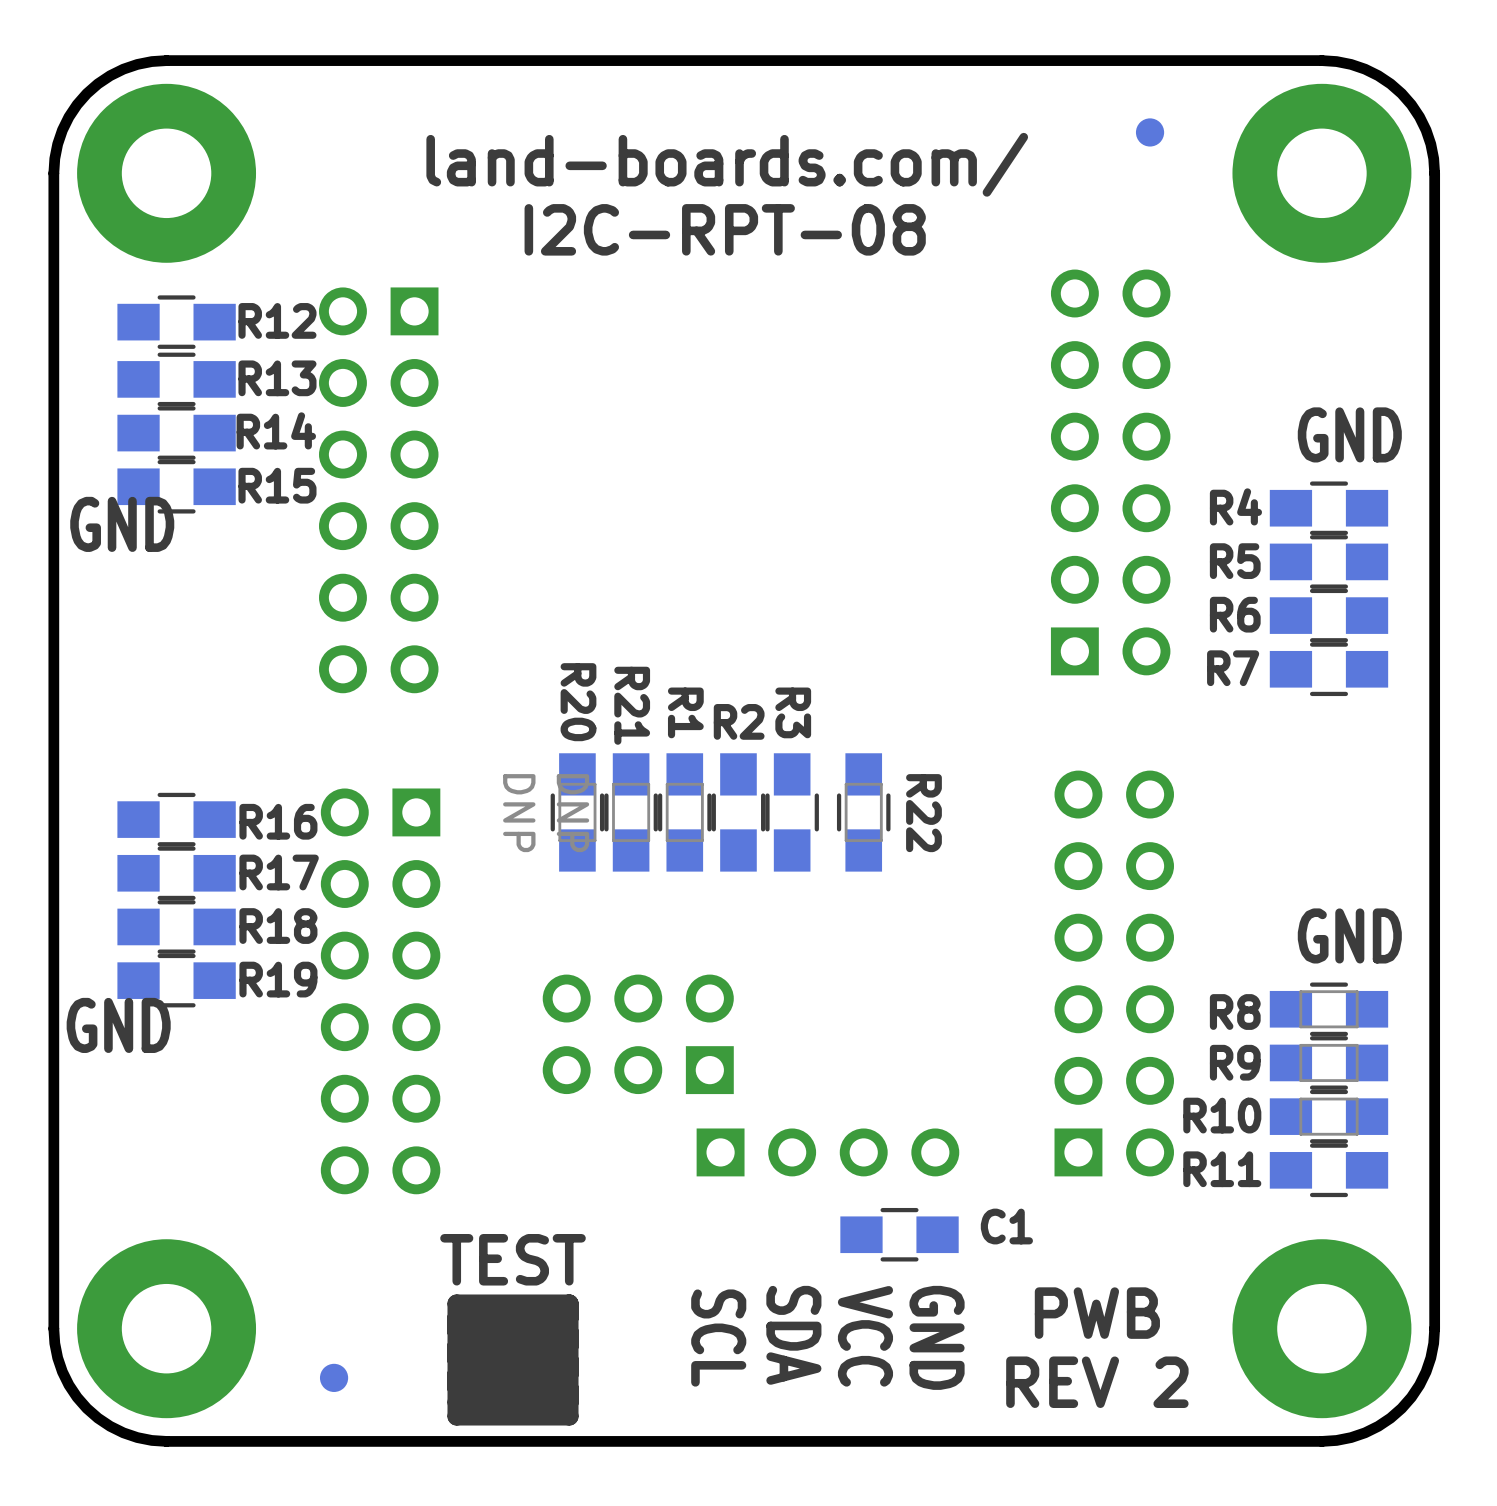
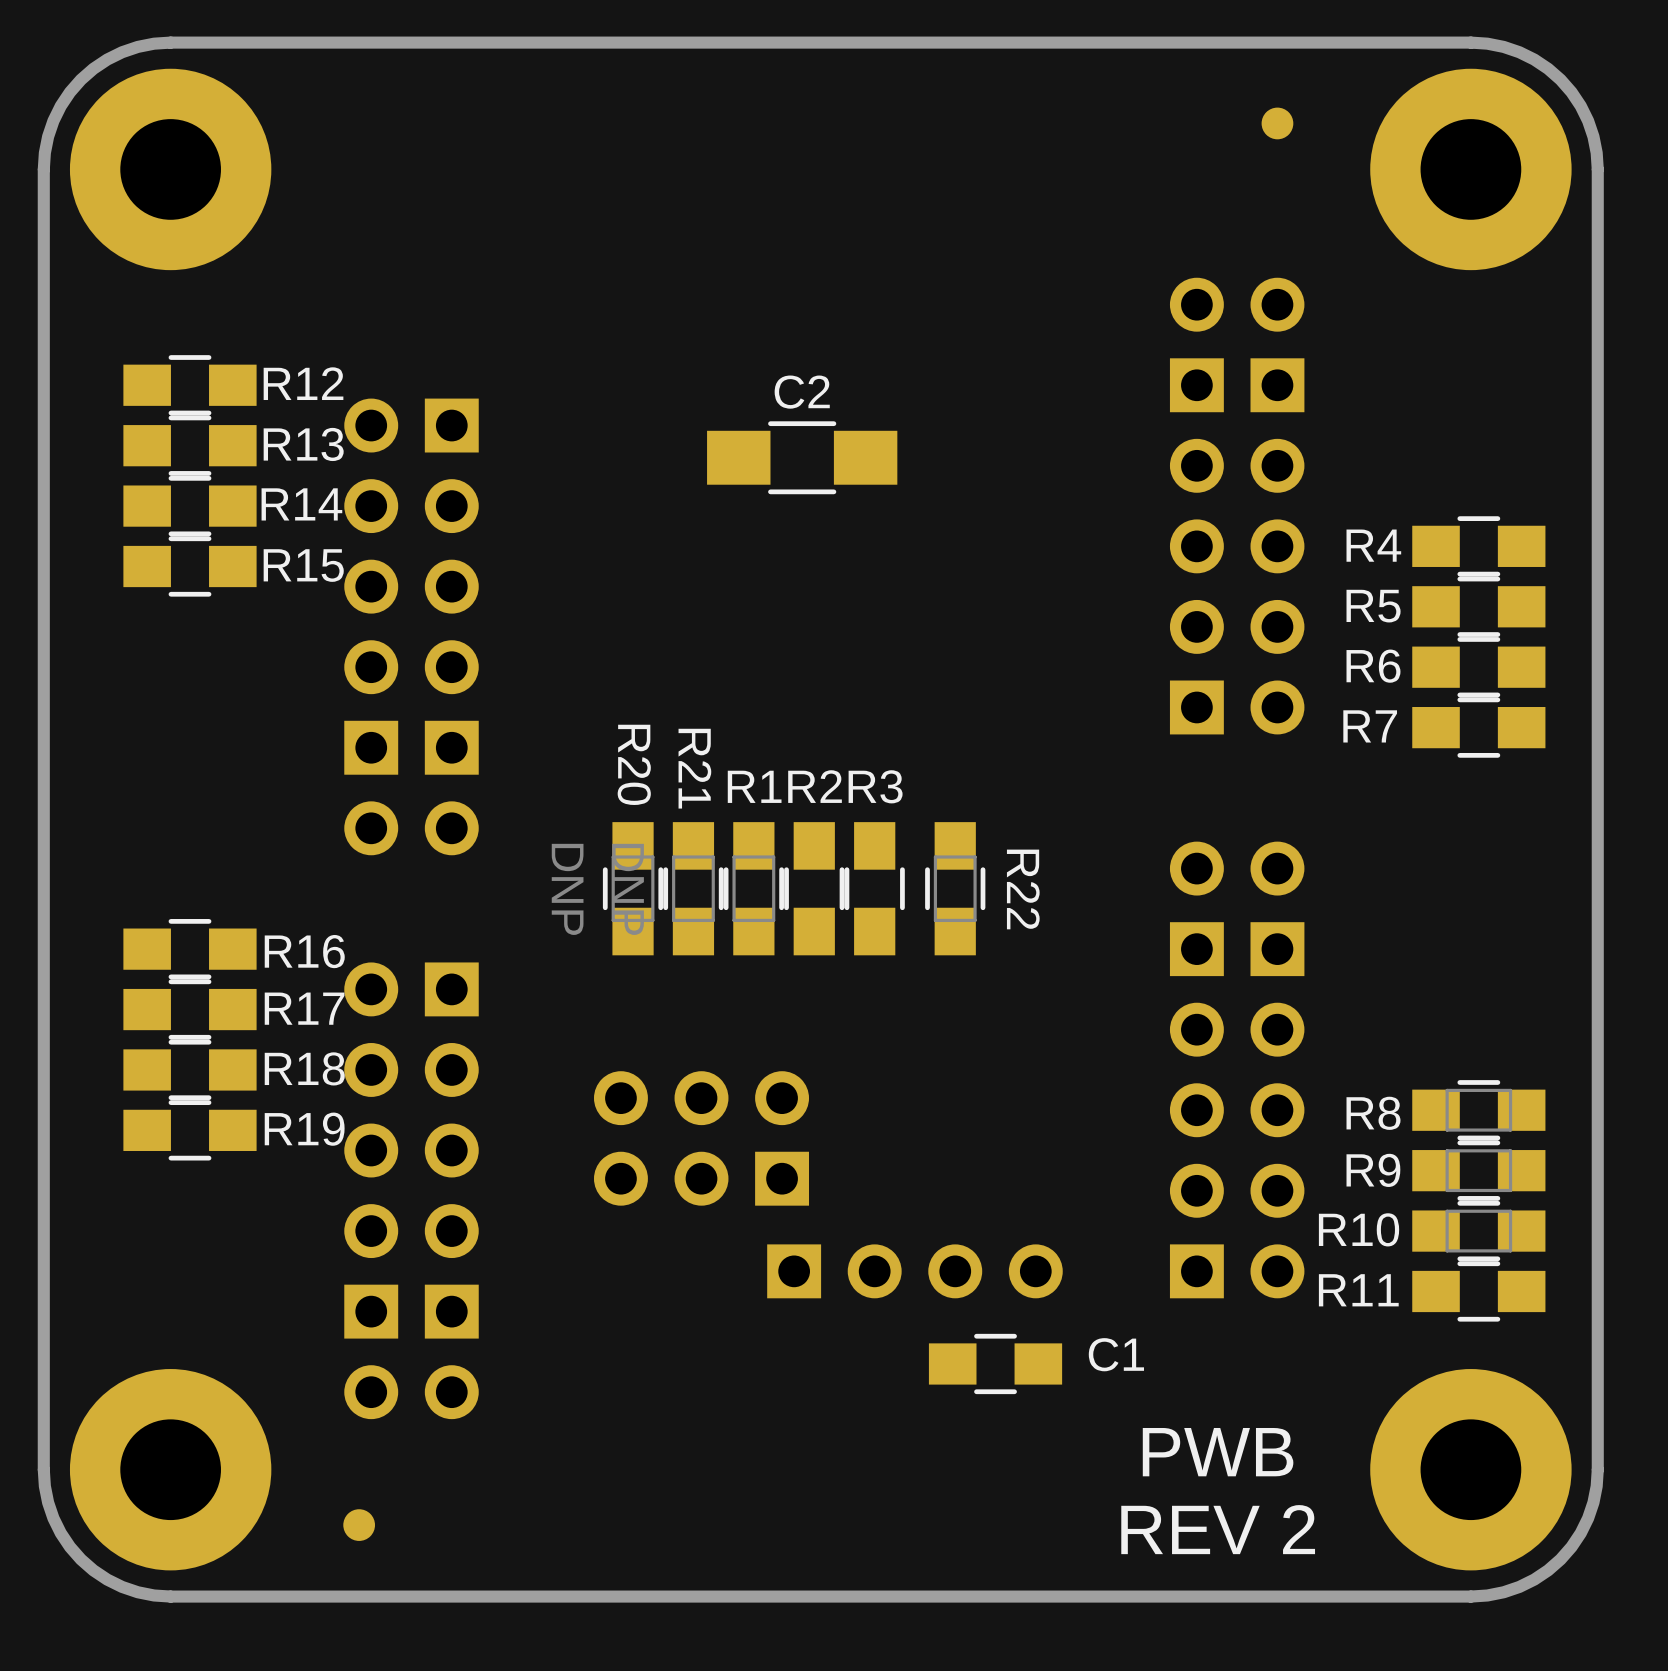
text: land-boards.com/ (727, 164) -> none
text: I2C-RPT-08 (725, 229) -> none
part footprint: [319, 287, 439, 694] -> [344, 398, 479, 695]
R12 position: (176, 322) -> (189, 385)
part: none -> (1196, 344)
part: none -> (1277, 344)
R13 position: (176, 379) -> (189, 445)
C2: none -> (802, 457)
R14 position: (176, 433) -> (189, 506)
text: GND (1349, 434) -> none
part: (1110, 472) -> none
R15 position: (176, 486) -> (189, 566)
text: GND (122, 524) -> none
part: none -> (1237, 586)
R1 name rotation: 0° (685, 712) -> 90° counterclockwise (754, 786)
R3 name rotation: 0° (793, 712) -> 90° counterclockwise (875, 786)
part: none -> (371, 788)
part: none -> (451, 788)
part footprint: [320, 788, 441, 1195] -> [344, 962, 479, 1259]
R16 position: (176, 819) -> (189, 949)
part: none -> (1196, 908)
part: none -> (1277, 908)
R17 position: (176, 873) -> (189, 1009)
R18 position: (176, 926) -> (189, 1069)
text: GND (1349, 935) -> none
part: (1114, 973) -> none
R19 position: (176, 980) -> (189, 1130)
text: GND (118, 1025) -> none
part: none -> (371, 1351)
part: none -> (451, 1351)
text: SDA (793, 1335) -> none
text: VCC (865, 1336) -> none
text: GND (937, 1337) -> none
text: SCL (718, 1338) -> none
TEST: (513, 1360) -> none

